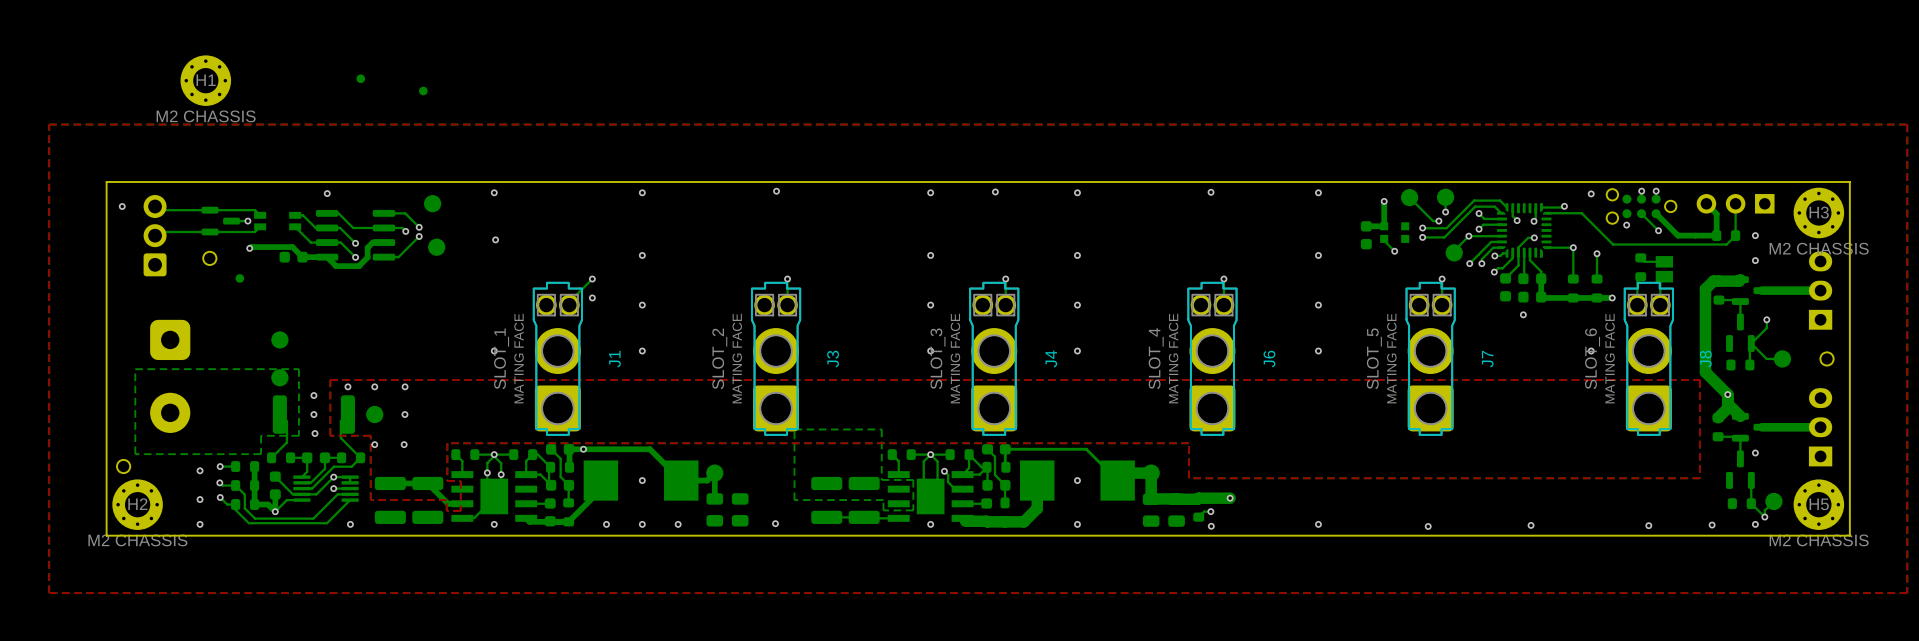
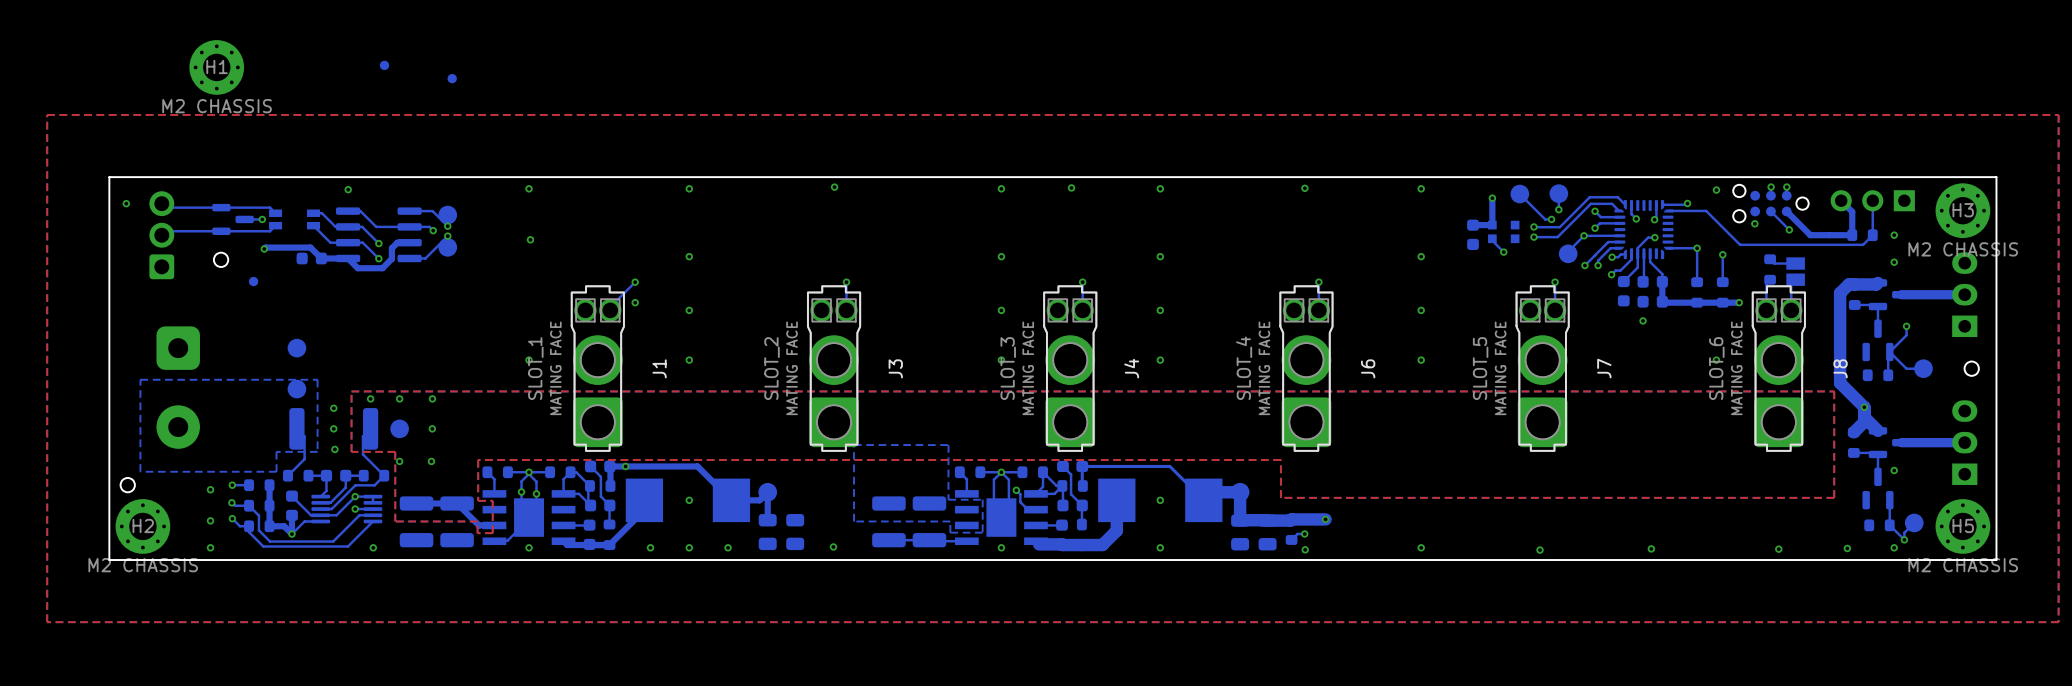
part: (432, 203) -> none
part: none -> (447, 215)
part: none -> (447, 247)
part: (436, 247) -> none

